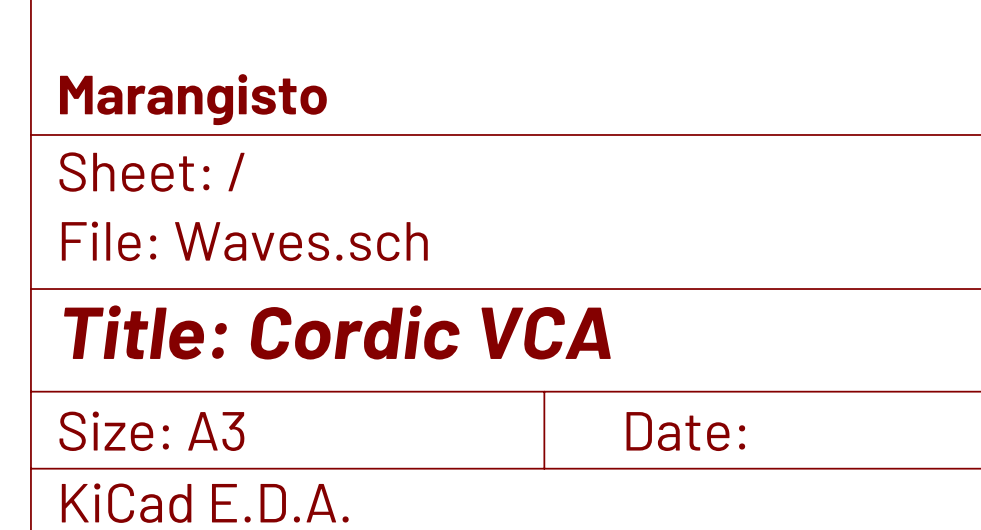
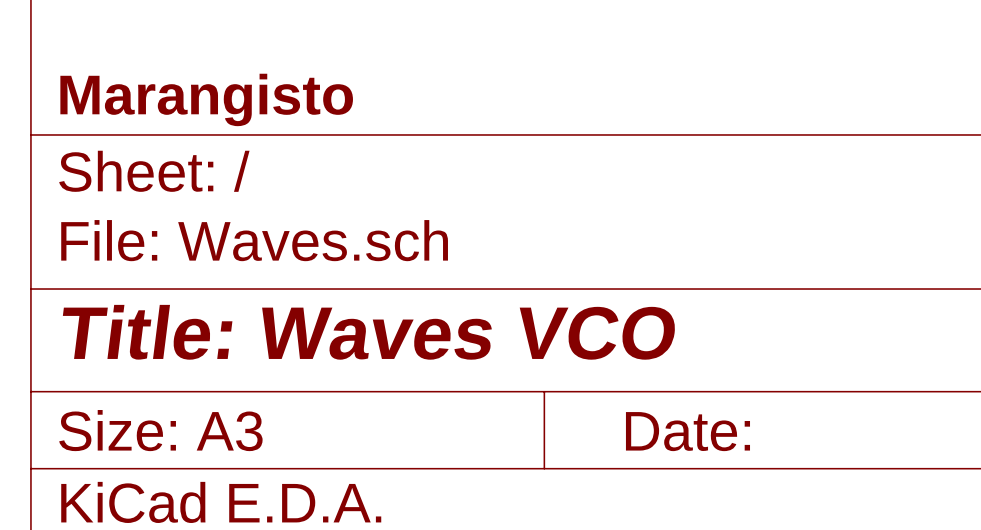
title block: Title: Cordic VCA (337, 332) -> Title: Waves VCO (369, 332)

